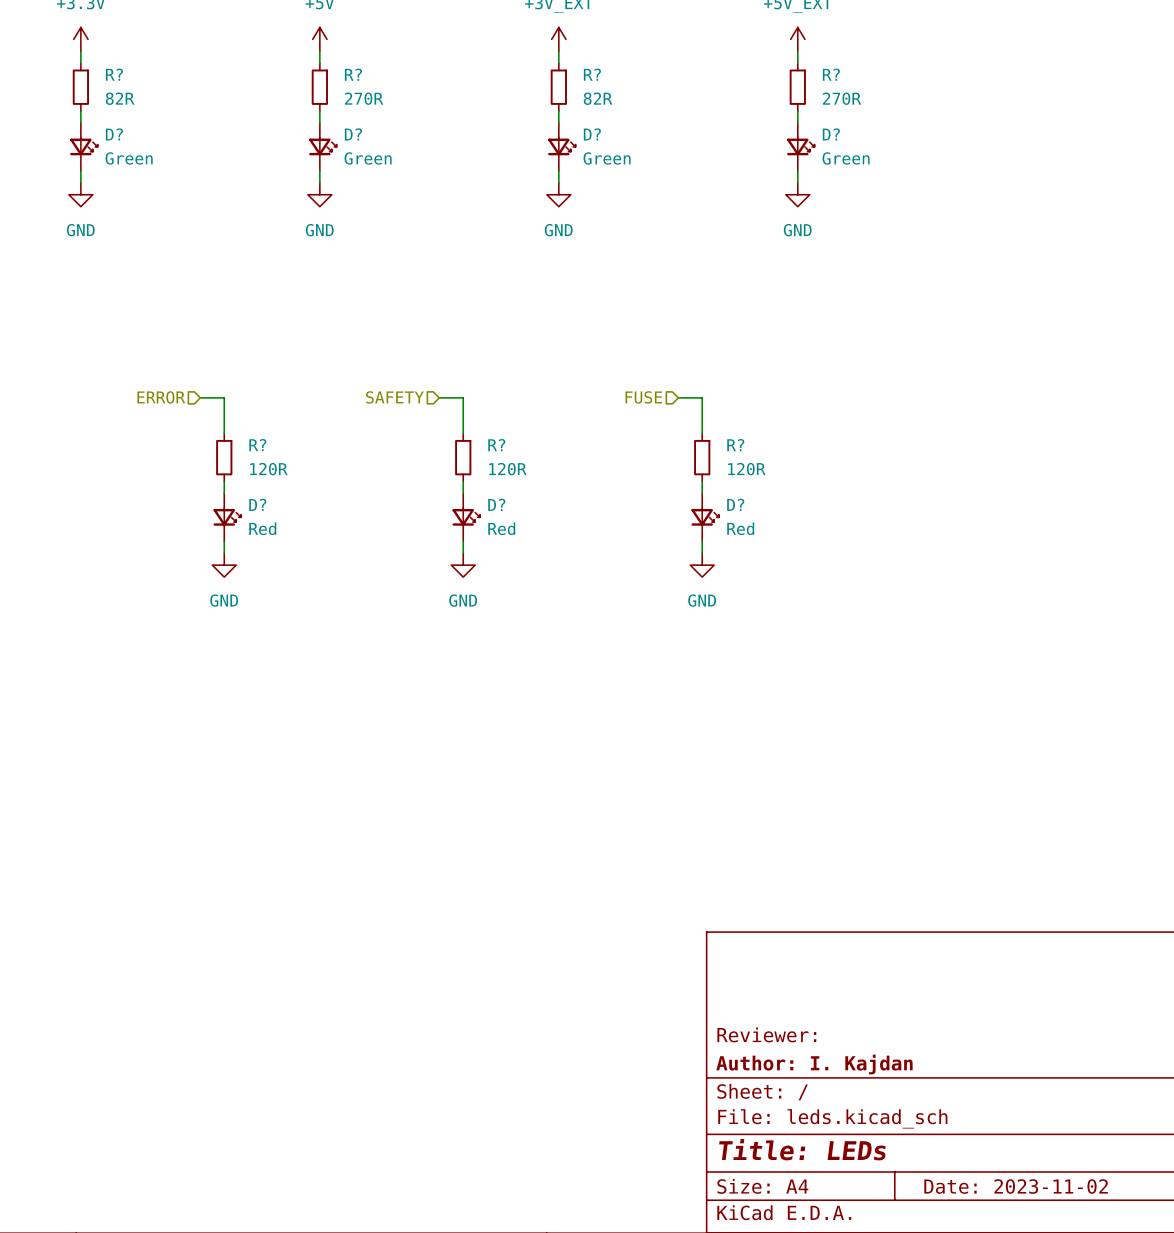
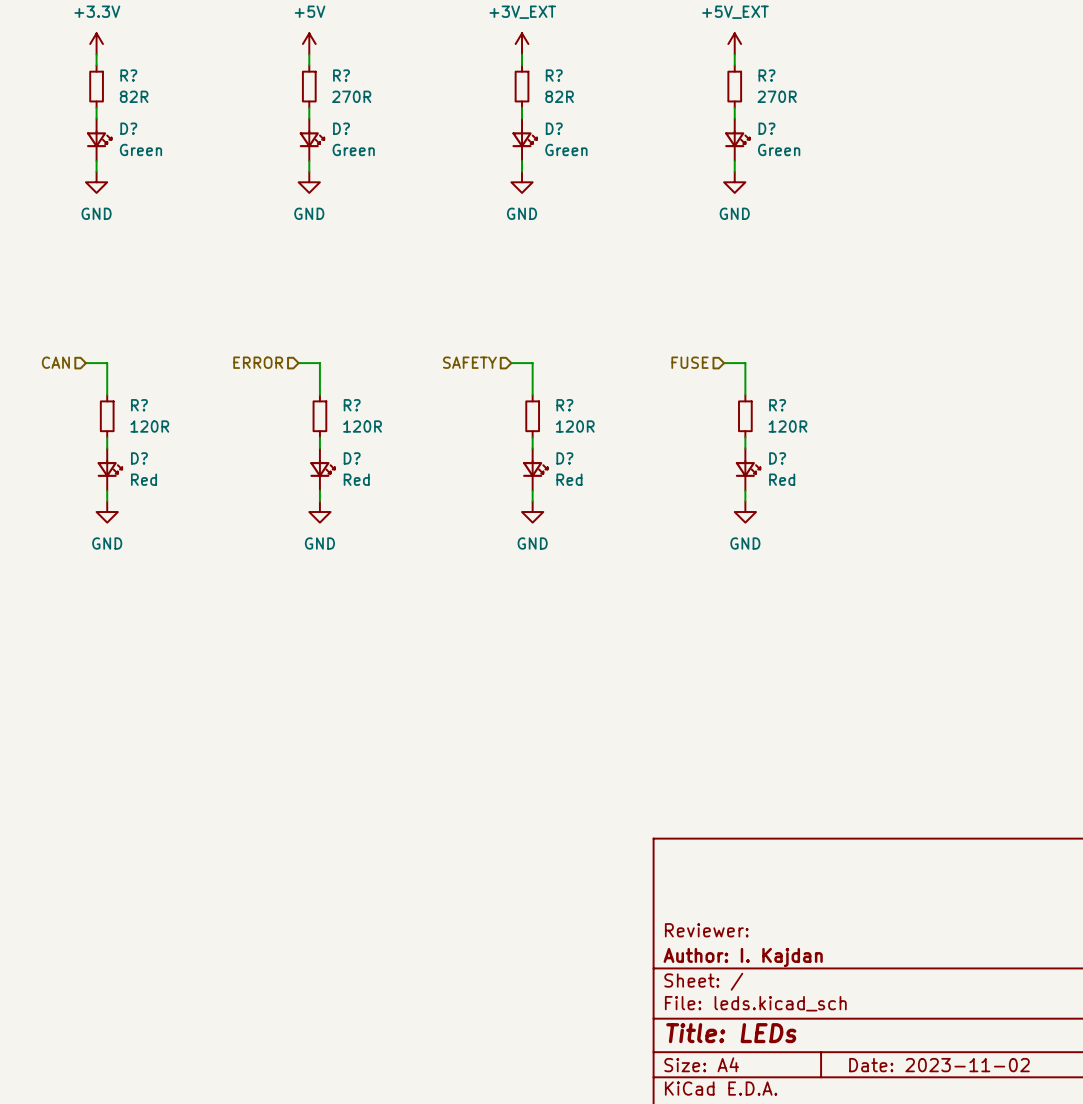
hierarchical label: none -> CAN (55, 362)
wire: none -> (85, 363) (107, 363) (107, 395)
hierarchical label position: ERROR (161, 397) -> ERROR (258, 362)
wire: (200, 397) (224, 397) (224, 433) -> (298, 363) (319, 363) (319, 395)
hierarchical label position: SAFETY (394, 397) -> SAFETY (469, 362)
wire: (439, 397) (463, 397) (463, 433) -> (511, 363) (532, 363) (532, 395)
hierarchical label position: FUSE (643, 397) -> FUSE (690, 362)
wire: (678, 397) (702, 397) (702, 433) -> (724, 363) (745, 363) (745, 395)
R?: none -> 120R (107, 416)
R?: 120R (224, 457) -> none
R?: none -> 120R (319, 416)
R?: 120R (463, 457) -> none
R?: none -> 120R (532, 416)
R?: 120R (702, 457) -> none
R?: none -> 120R (745, 416)
wire: none -> (107, 437) (107, 448)
wire: (224, 481) (224, 493) -> (319, 437) (319, 448)
wire: (463, 481) (463, 493) -> (532, 437) (532, 448)
wire: (702, 481) (702, 493) -> (745, 437) (745, 448)
D?: none -> Red (109, 469)
D?: Red (227, 517) -> none
D?: none -> Red (322, 469)
D?: Red (466, 517) -> none
D?: none -> Red (535, 469)
D?: Red (705, 517) -> none
D?: none -> Red (748, 469)
wire: none -> (107, 490) (107, 501)
wire: (224, 541) (224, 553) -> (319, 490) (319, 501)
wire: (463, 541) (463, 553) -> (532, 490) (532, 501)
wire: (702, 541) (702, 553) -> (745, 490) (745, 501)
power symbol: none -> GND (107, 512)
power symbol: GND (224, 565) -> none
power symbol: none -> GND (319, 512)
power symbol: GND (463, 565) -> none
power symbol: none -> GND (532, 512)
power symbol: GND (702, 565) -> none
power symbol: none -> GND (745, 512)

